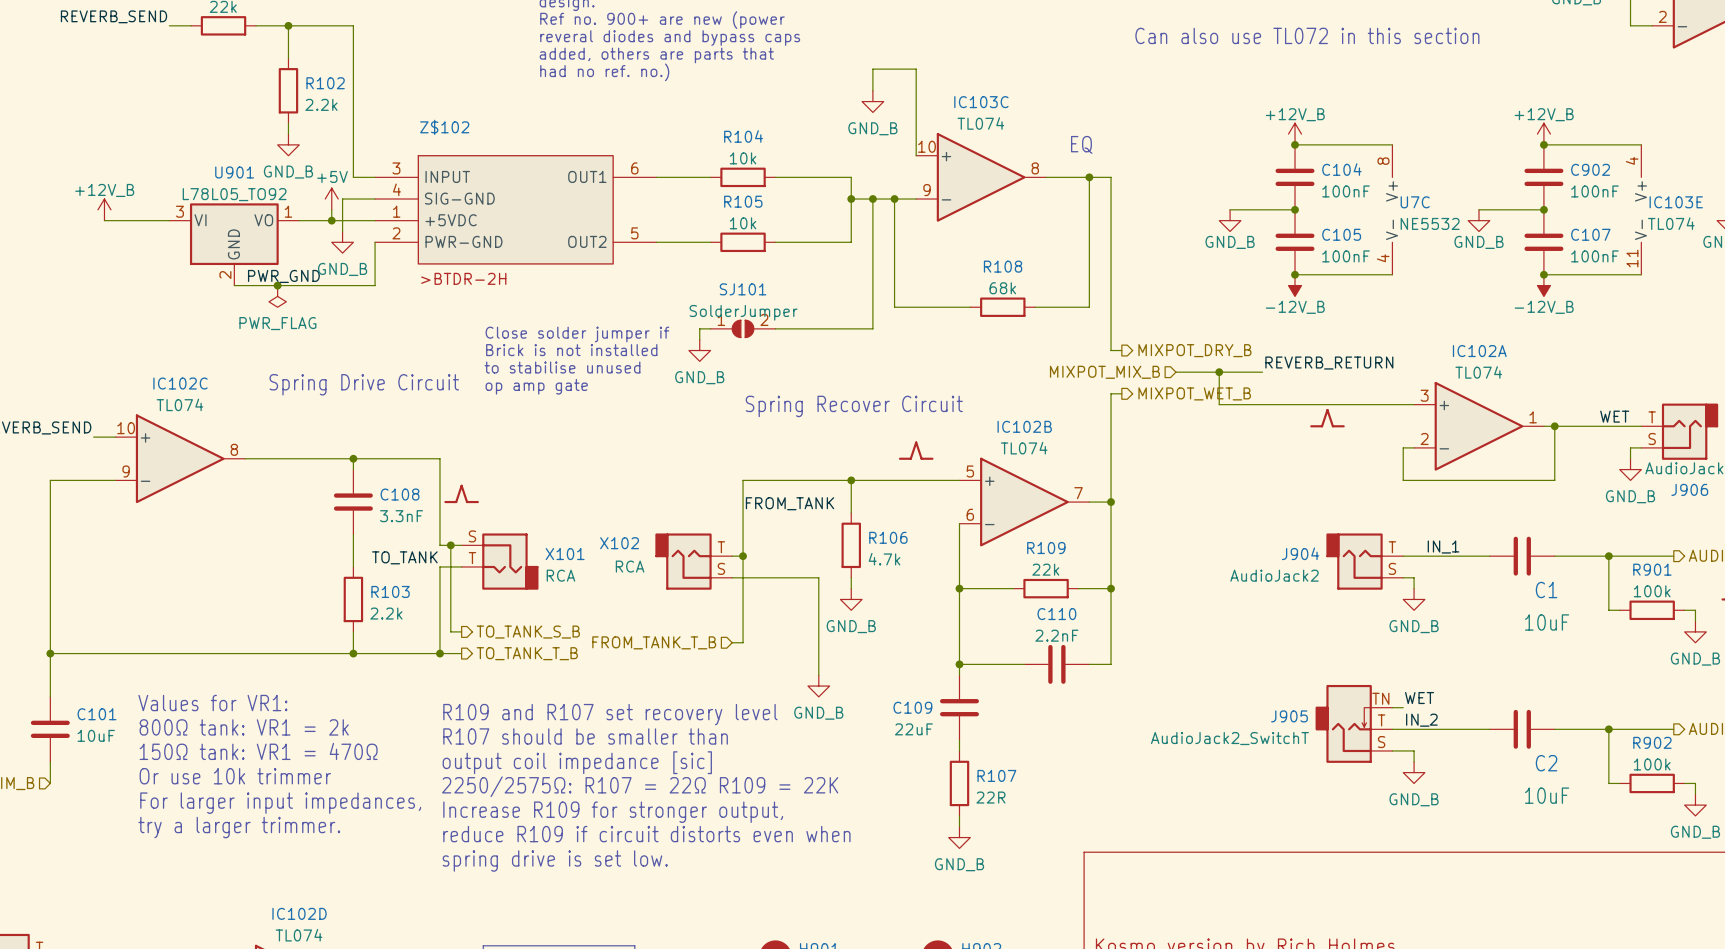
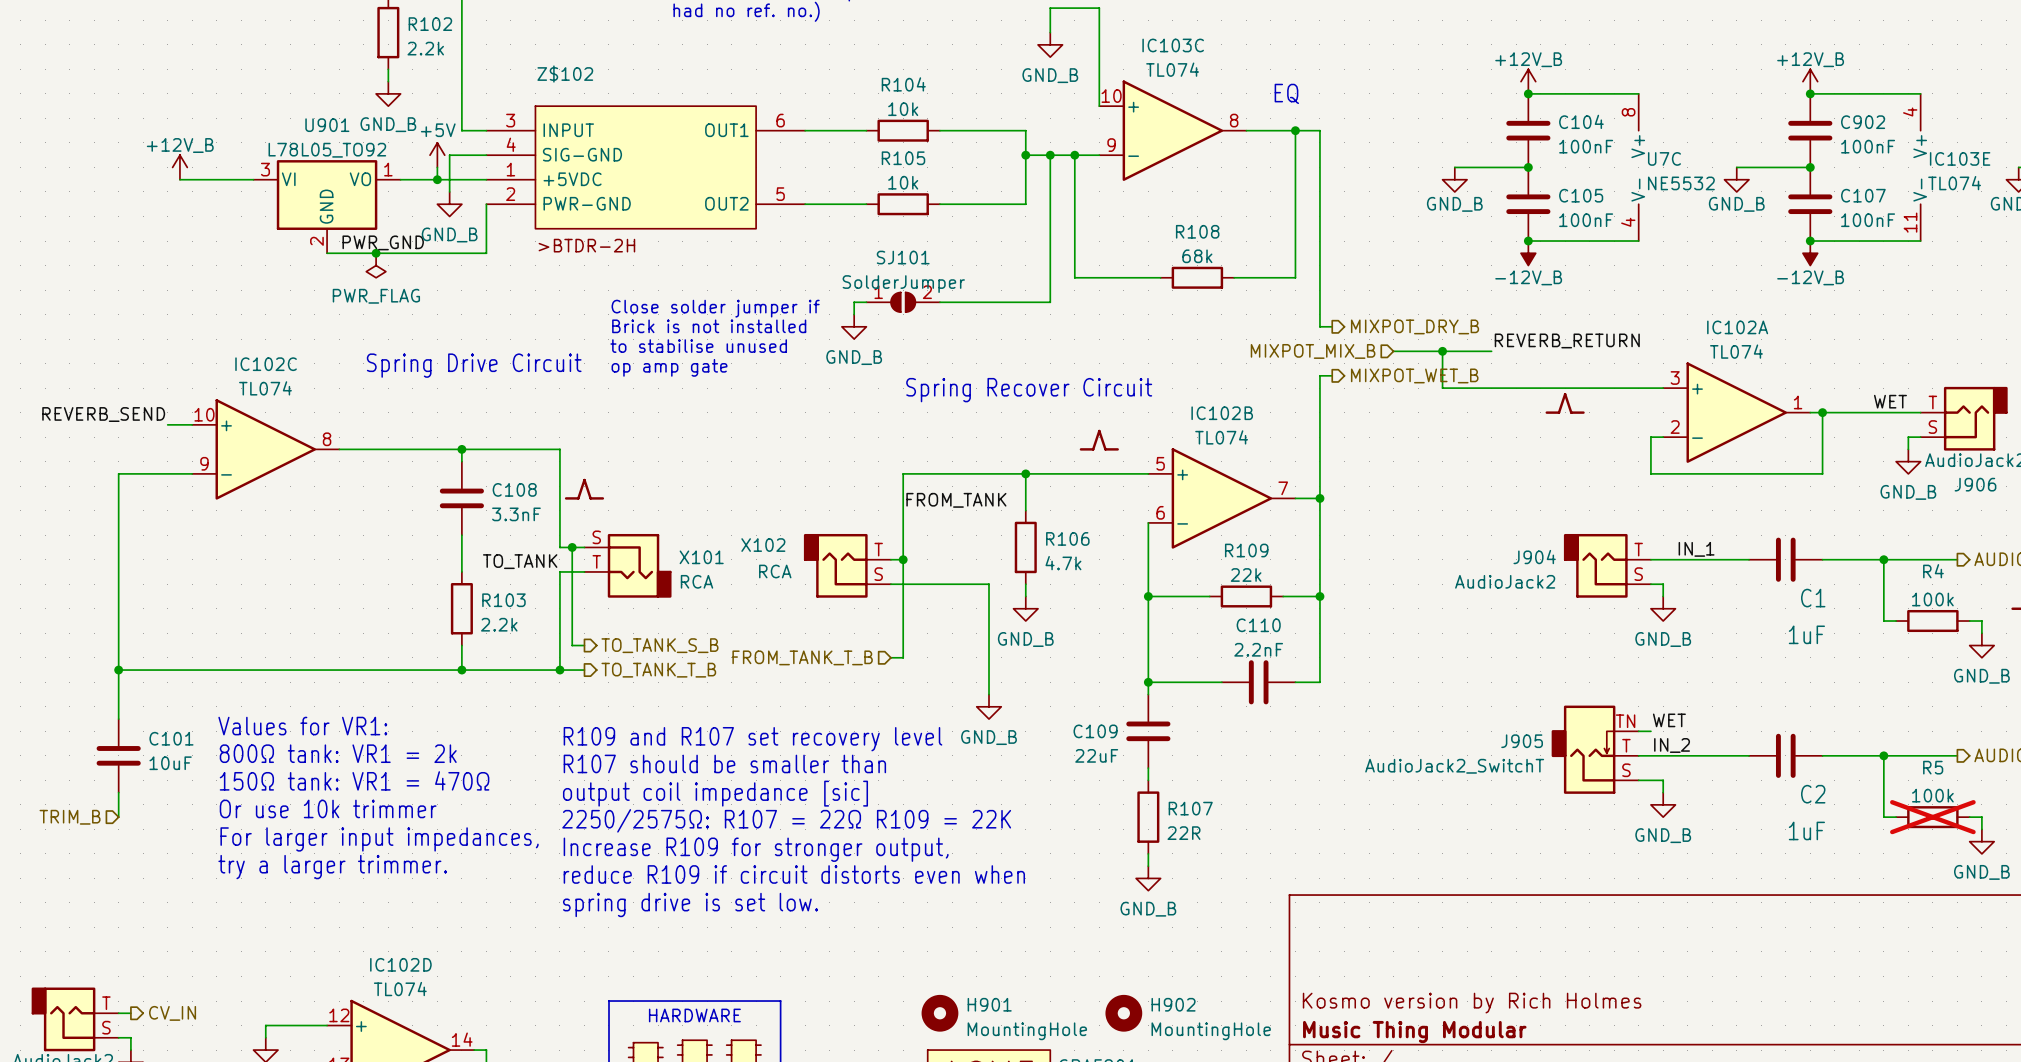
R901 name: R901 (1652, 569) -> R4 (1933, 571)
C1 value: 10uF (1547, 622) -> 1uF (1806, 634)
R902 name: R902 (1652, 742) -> R5 (1933, 767)
R902 do-not-place cross: none -> (1932, 817)
C2 value: 10uF (1547, 795) -> 1uF (1806, 830)

